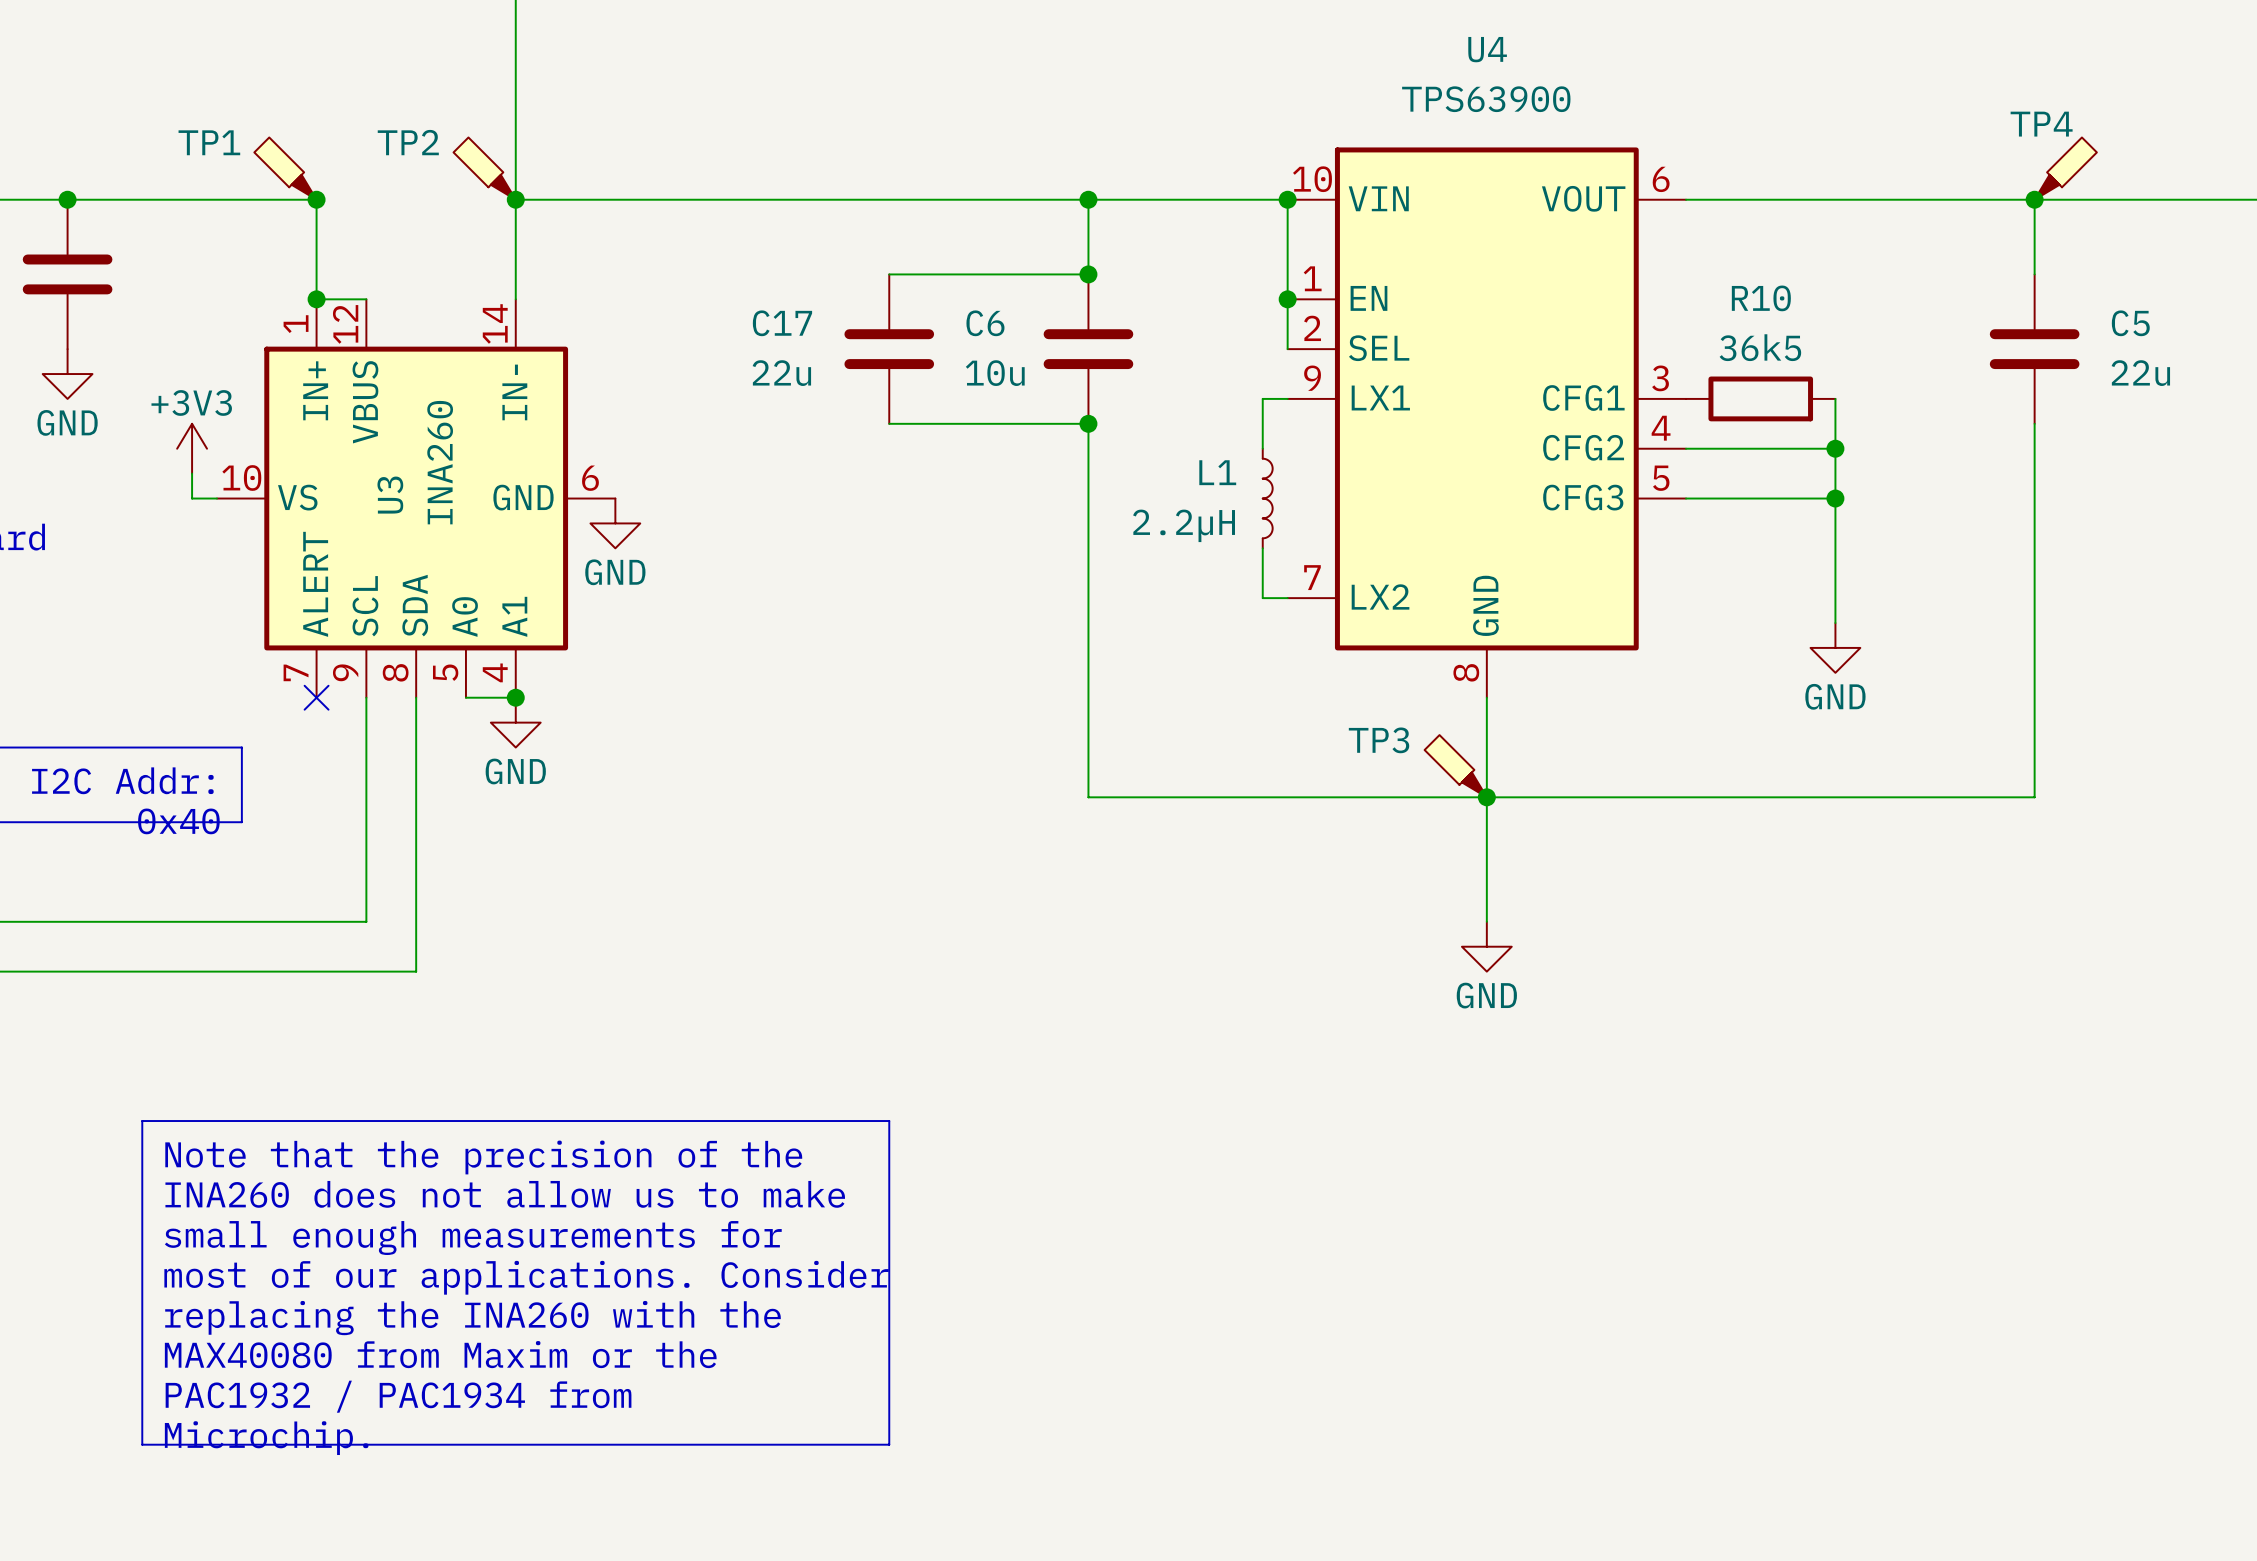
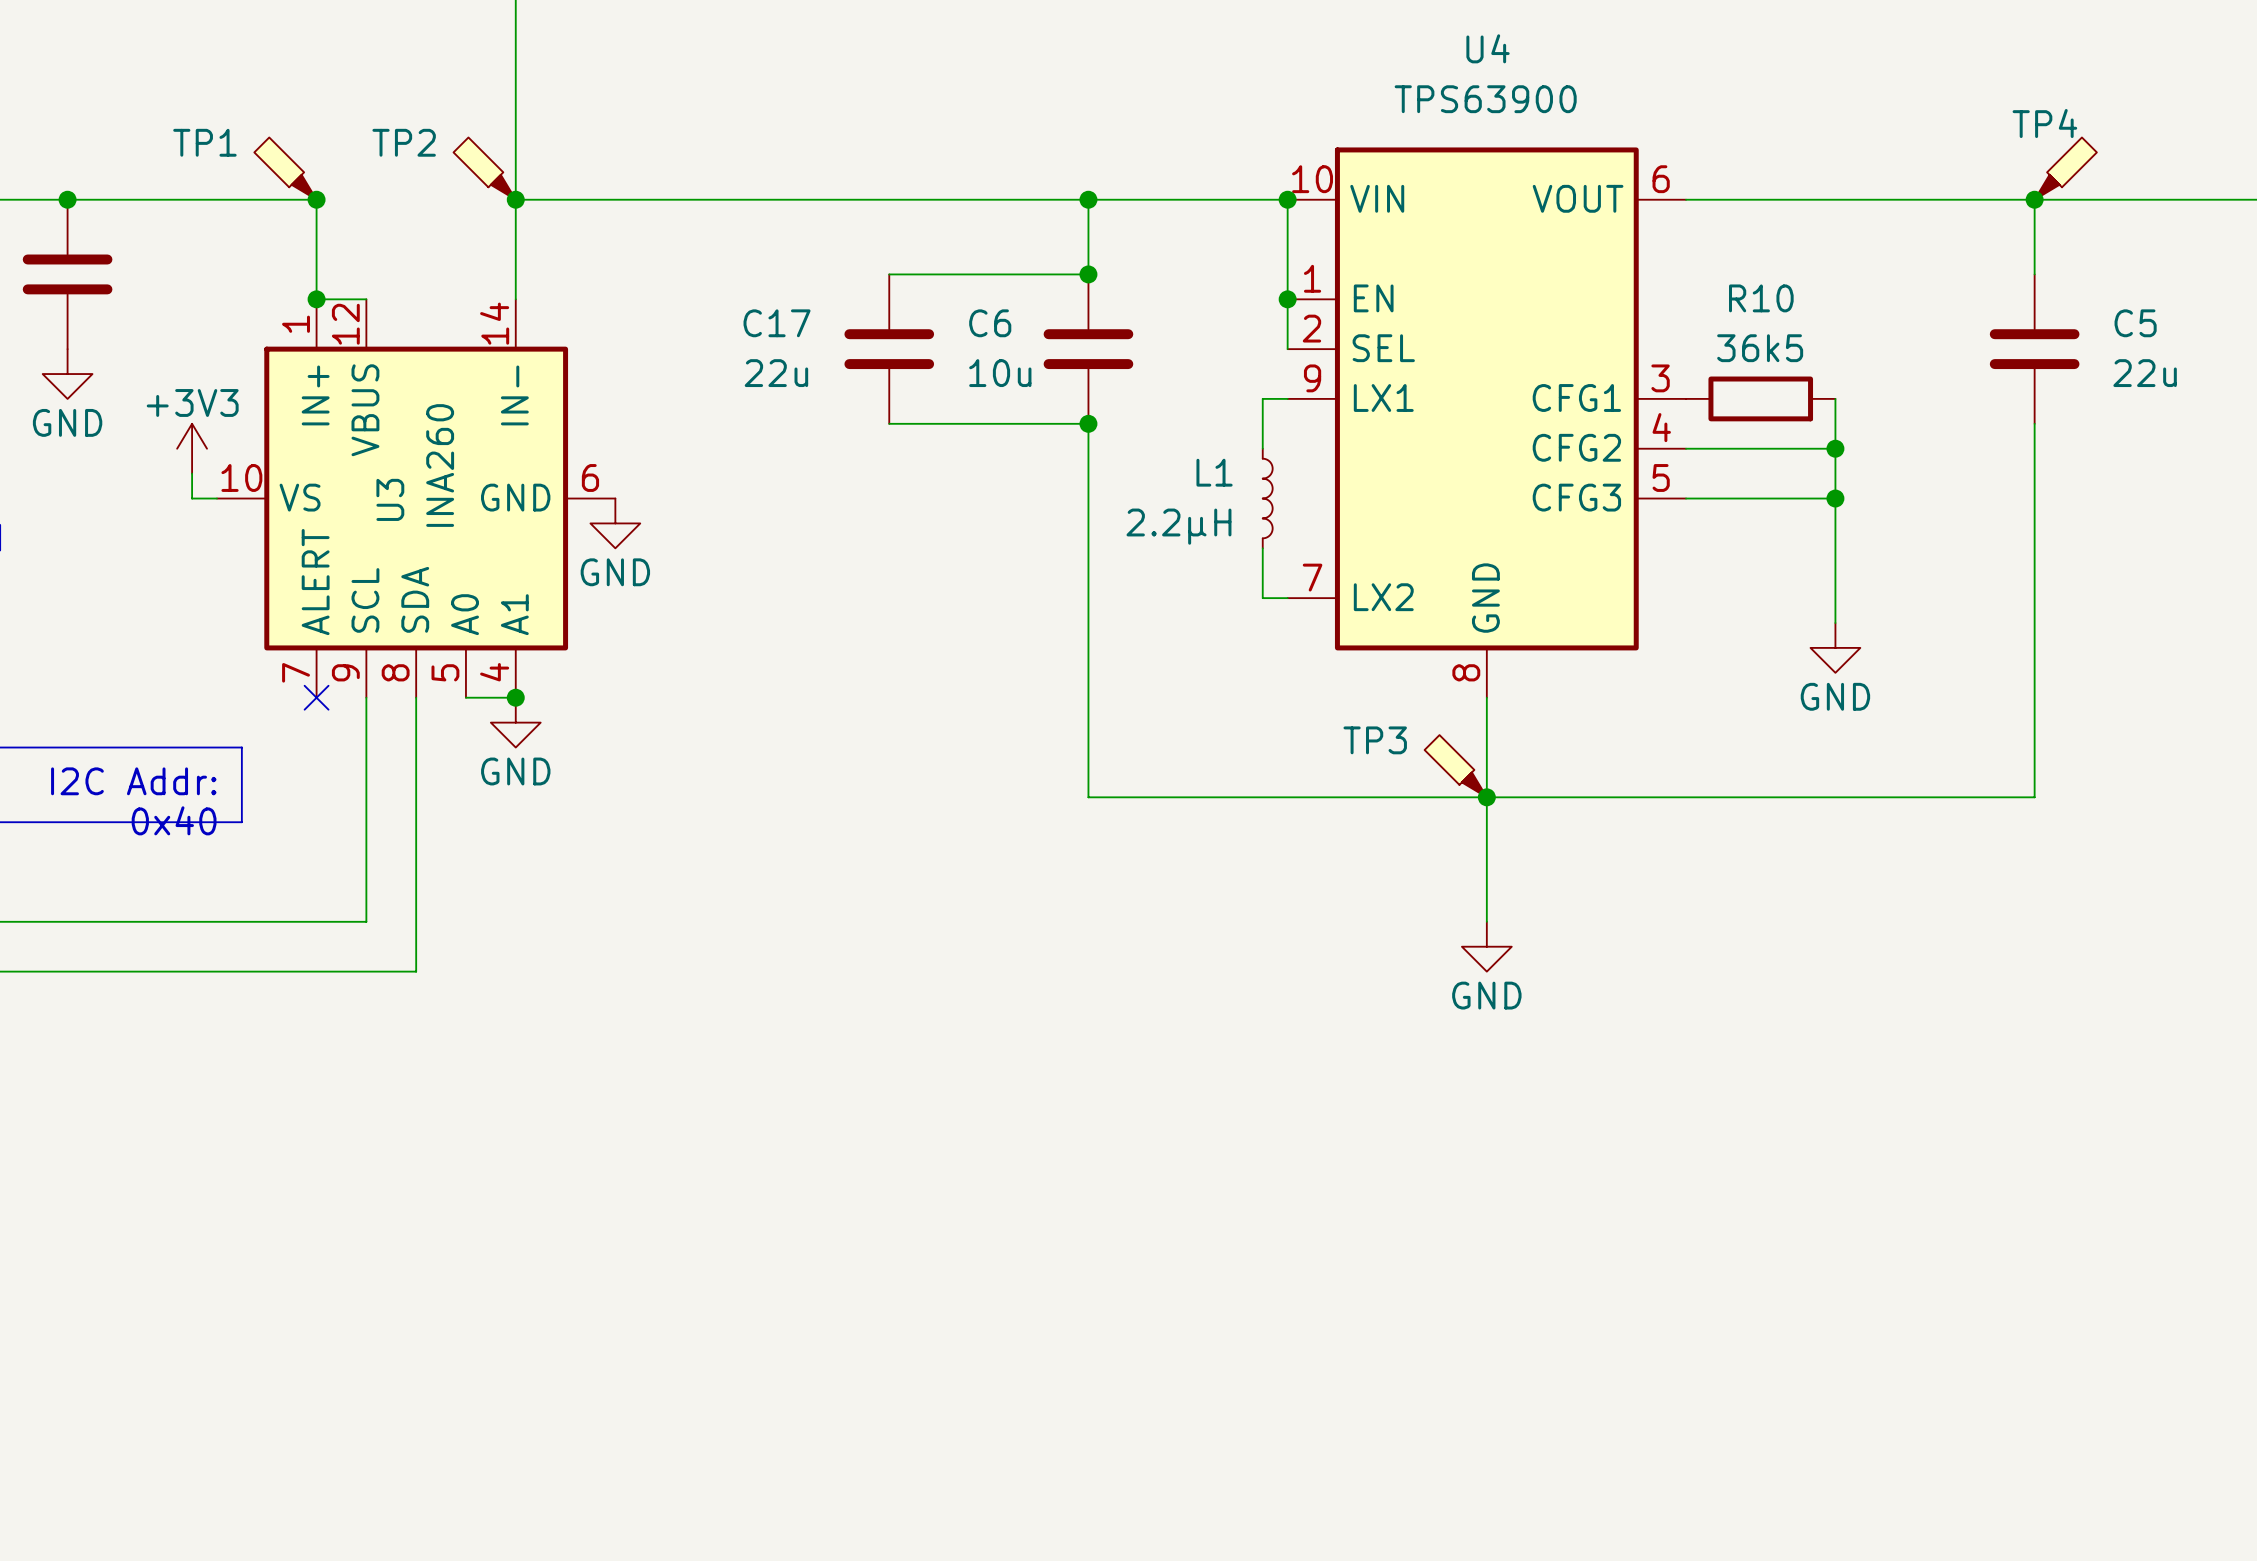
line: (142, 1121) (889, 1121) (889, 1444) (142, 1444) (142, 1121) -> none
text: Note that the precision of the (483, 1157) -> none
text: INA260 does not allow us to make (505, 1194) -> none
text: small enough measurements for (473, 1238) -> none
text: most of our applications. Consider (526, 1277) -> none
text: replacing the INA260 with the (472, 1318) -> none
text: MAX40080 from Maxim or the (440, 1354) -> none
text: PAC1932 / PAC1934 from (398, 1396) -> none
text: Microchip. (266, 1438) -> none

